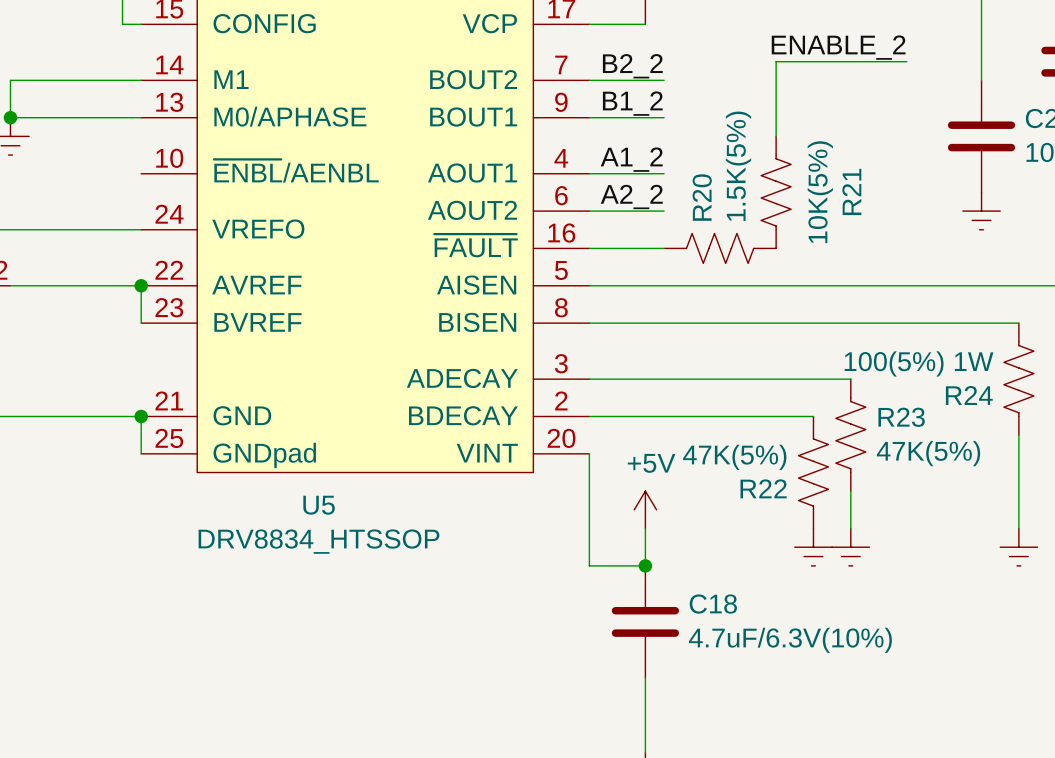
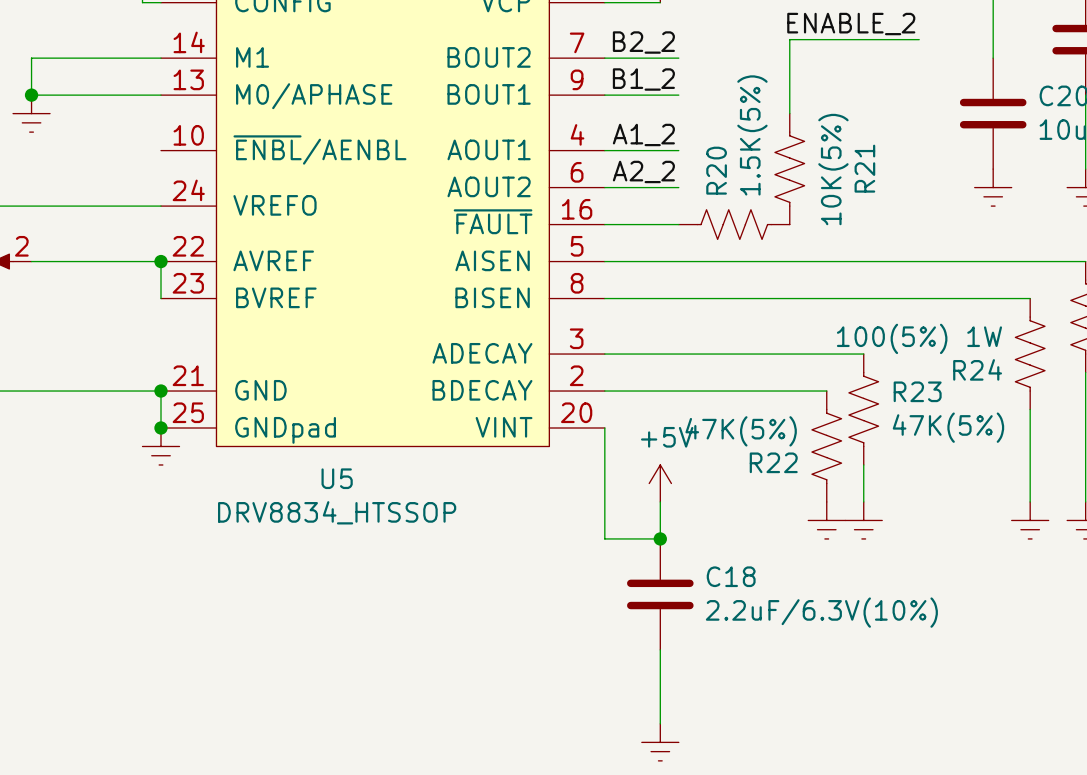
junction: none -> (160, 428)
power symbol: none -> (160, 446)
C18 value: 4.7uF/6.3V(10%) (790, 640) -> 2.2uF/6.3V(10%) (821, 612)

